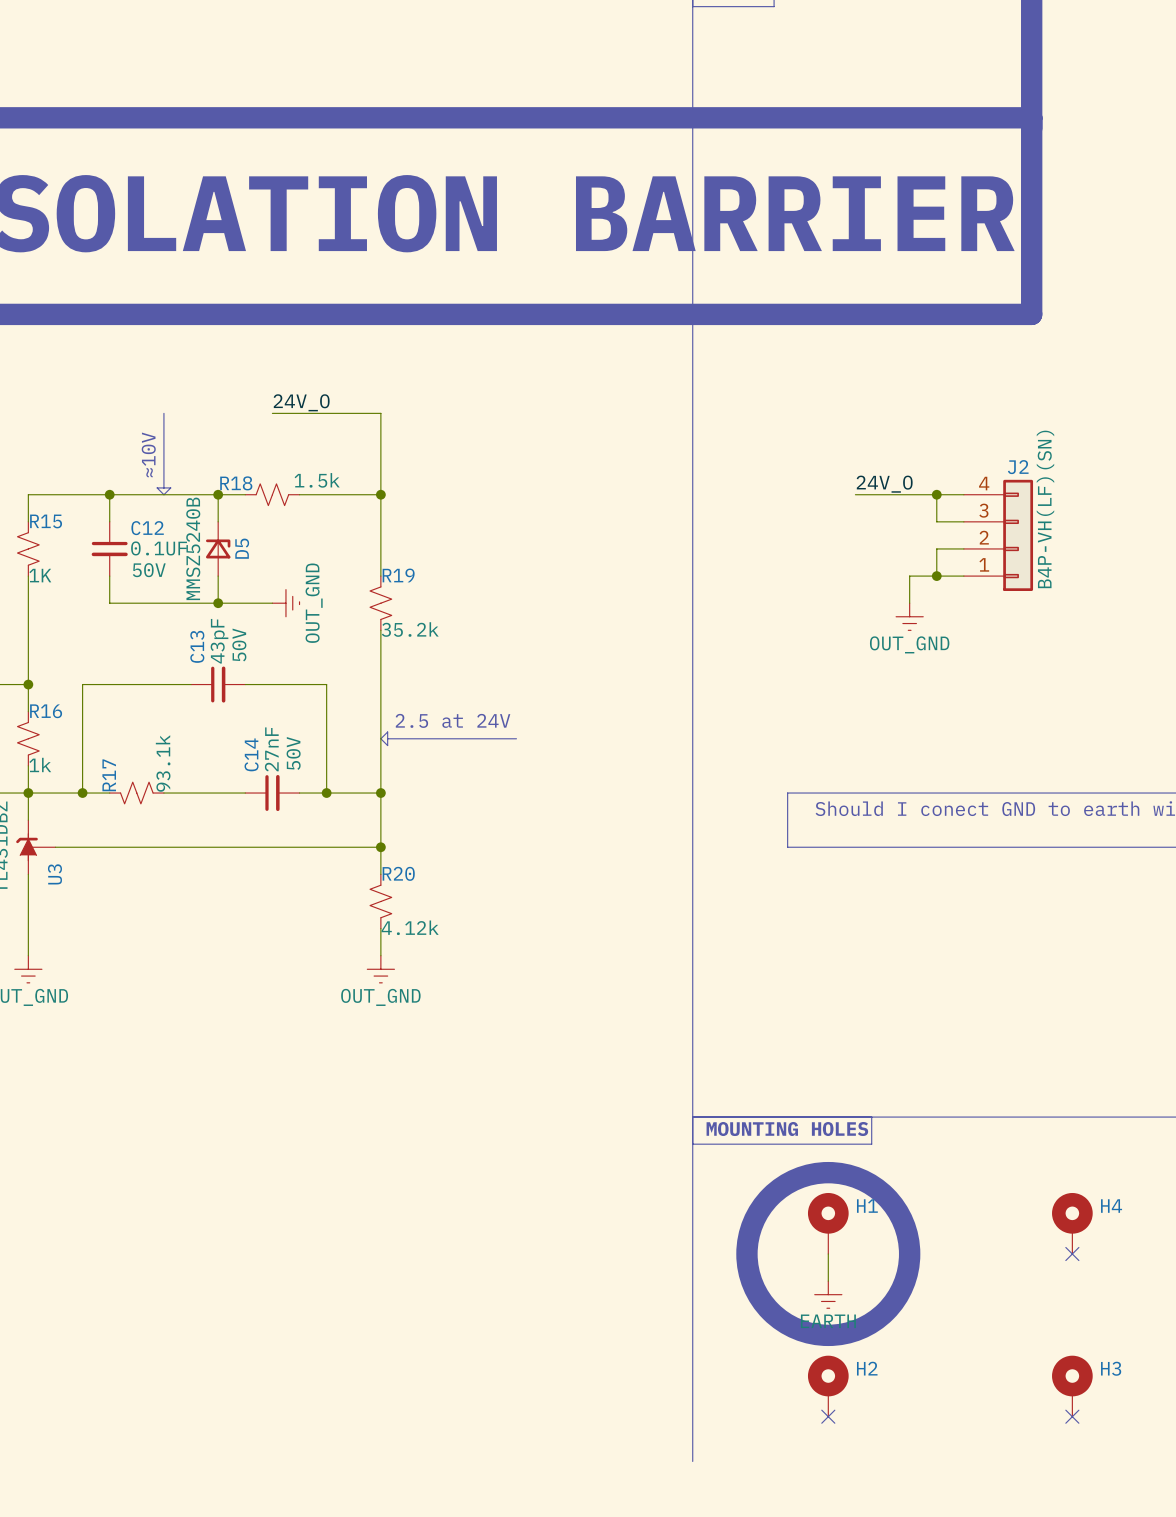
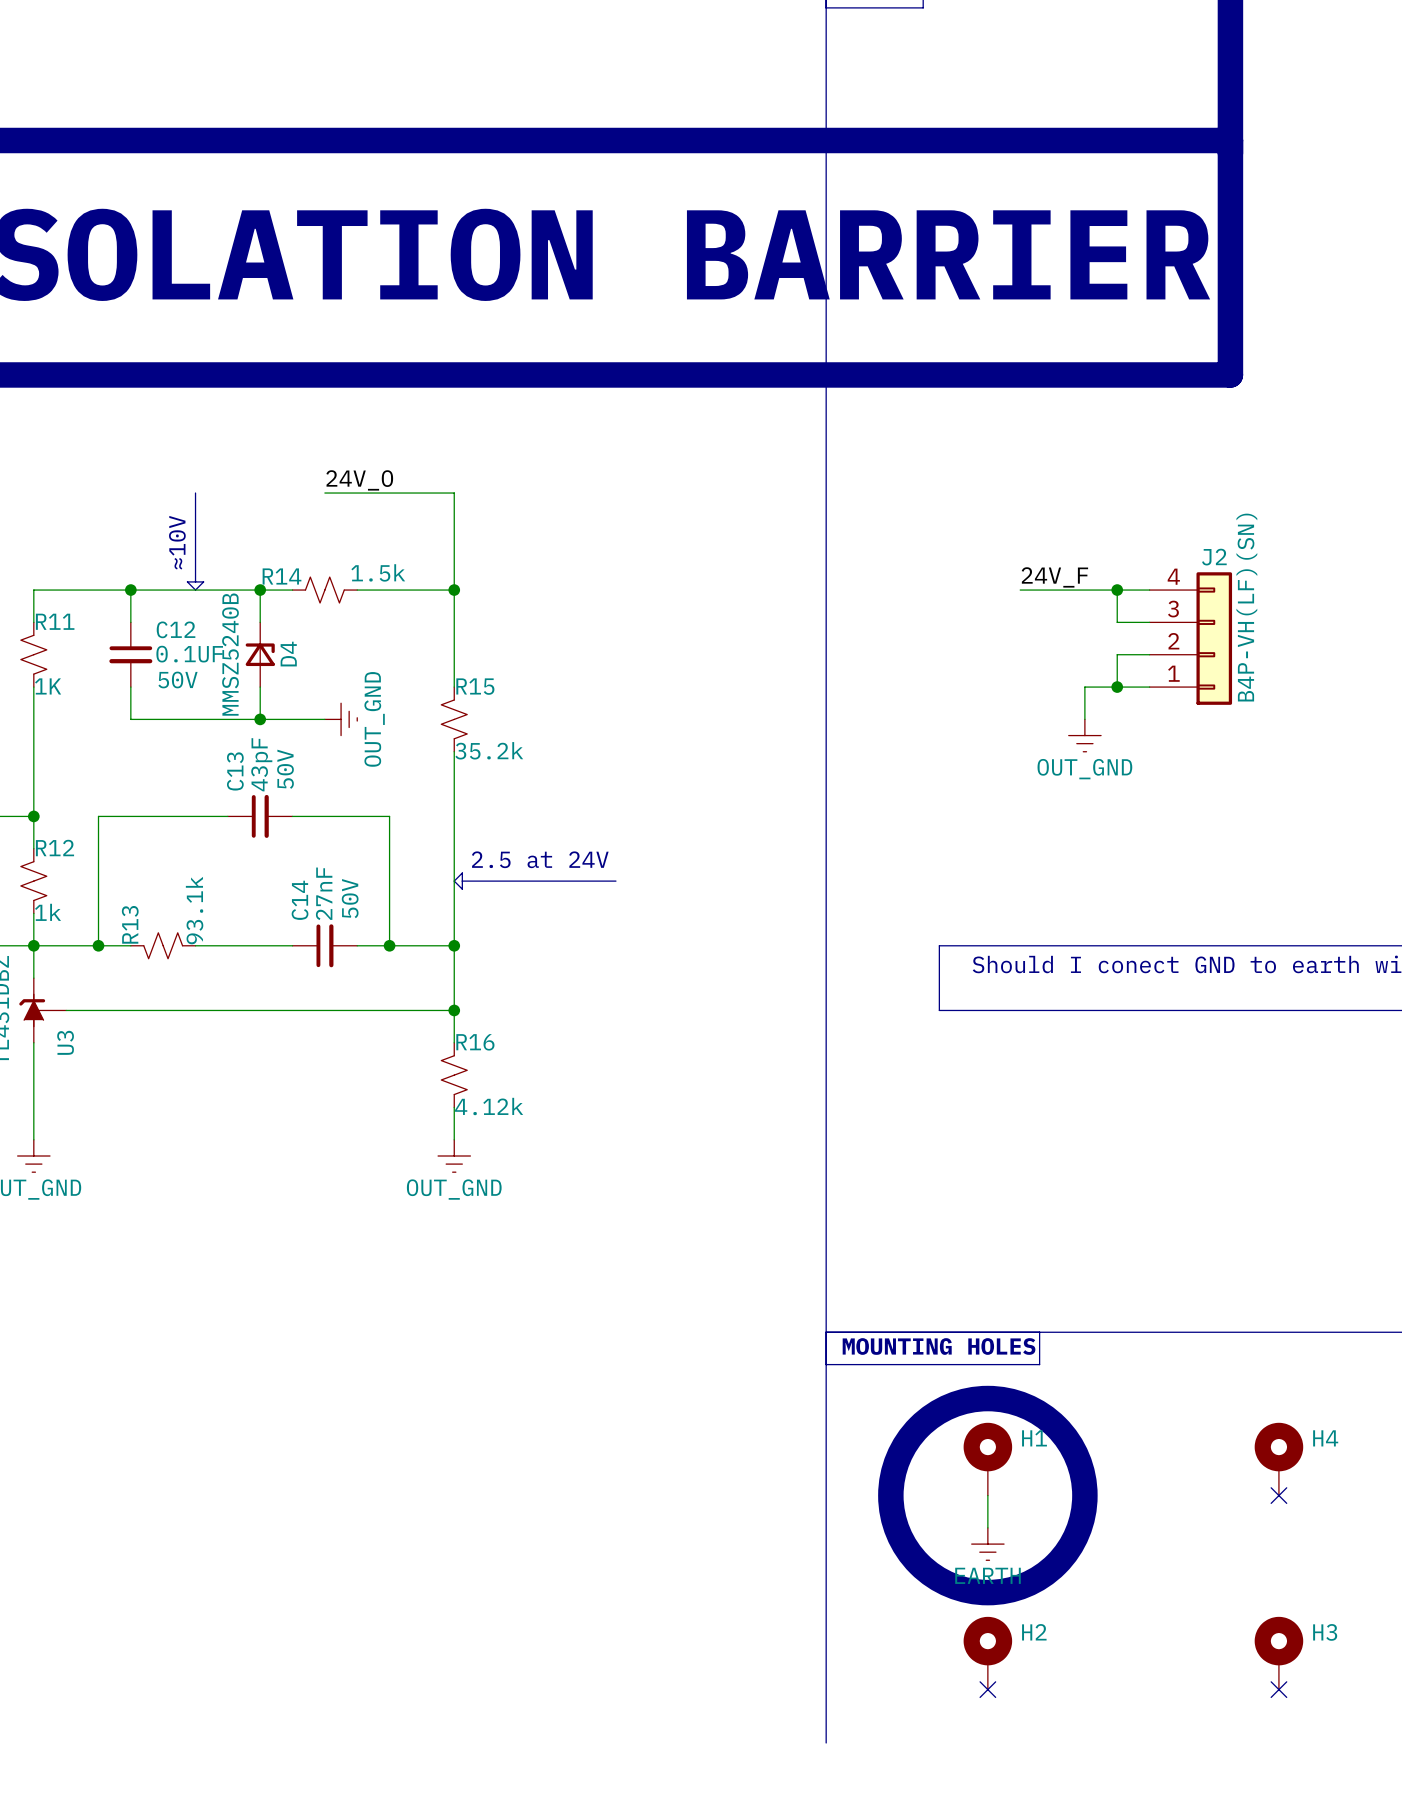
R18 name: R18 (236, 483) -> R14 (282, 576)
label: 24V_O (884, 484) -> 24V_F (1054, 577)
R15 name: R15 (46, 521) -> R11 (55, 621)
D5 name: D5 (242, 548) -> D4 (288, 654)
R19 name: R19 (398, 575) -> R15 (475, 686)
R16 name: R16 (46, 711) -> R12 (54, 848)
R17 name: R17 (109, 775) -> R13 (130, 924)
R20 name: R20 (398, 873) -> R16 (475, 1042)

